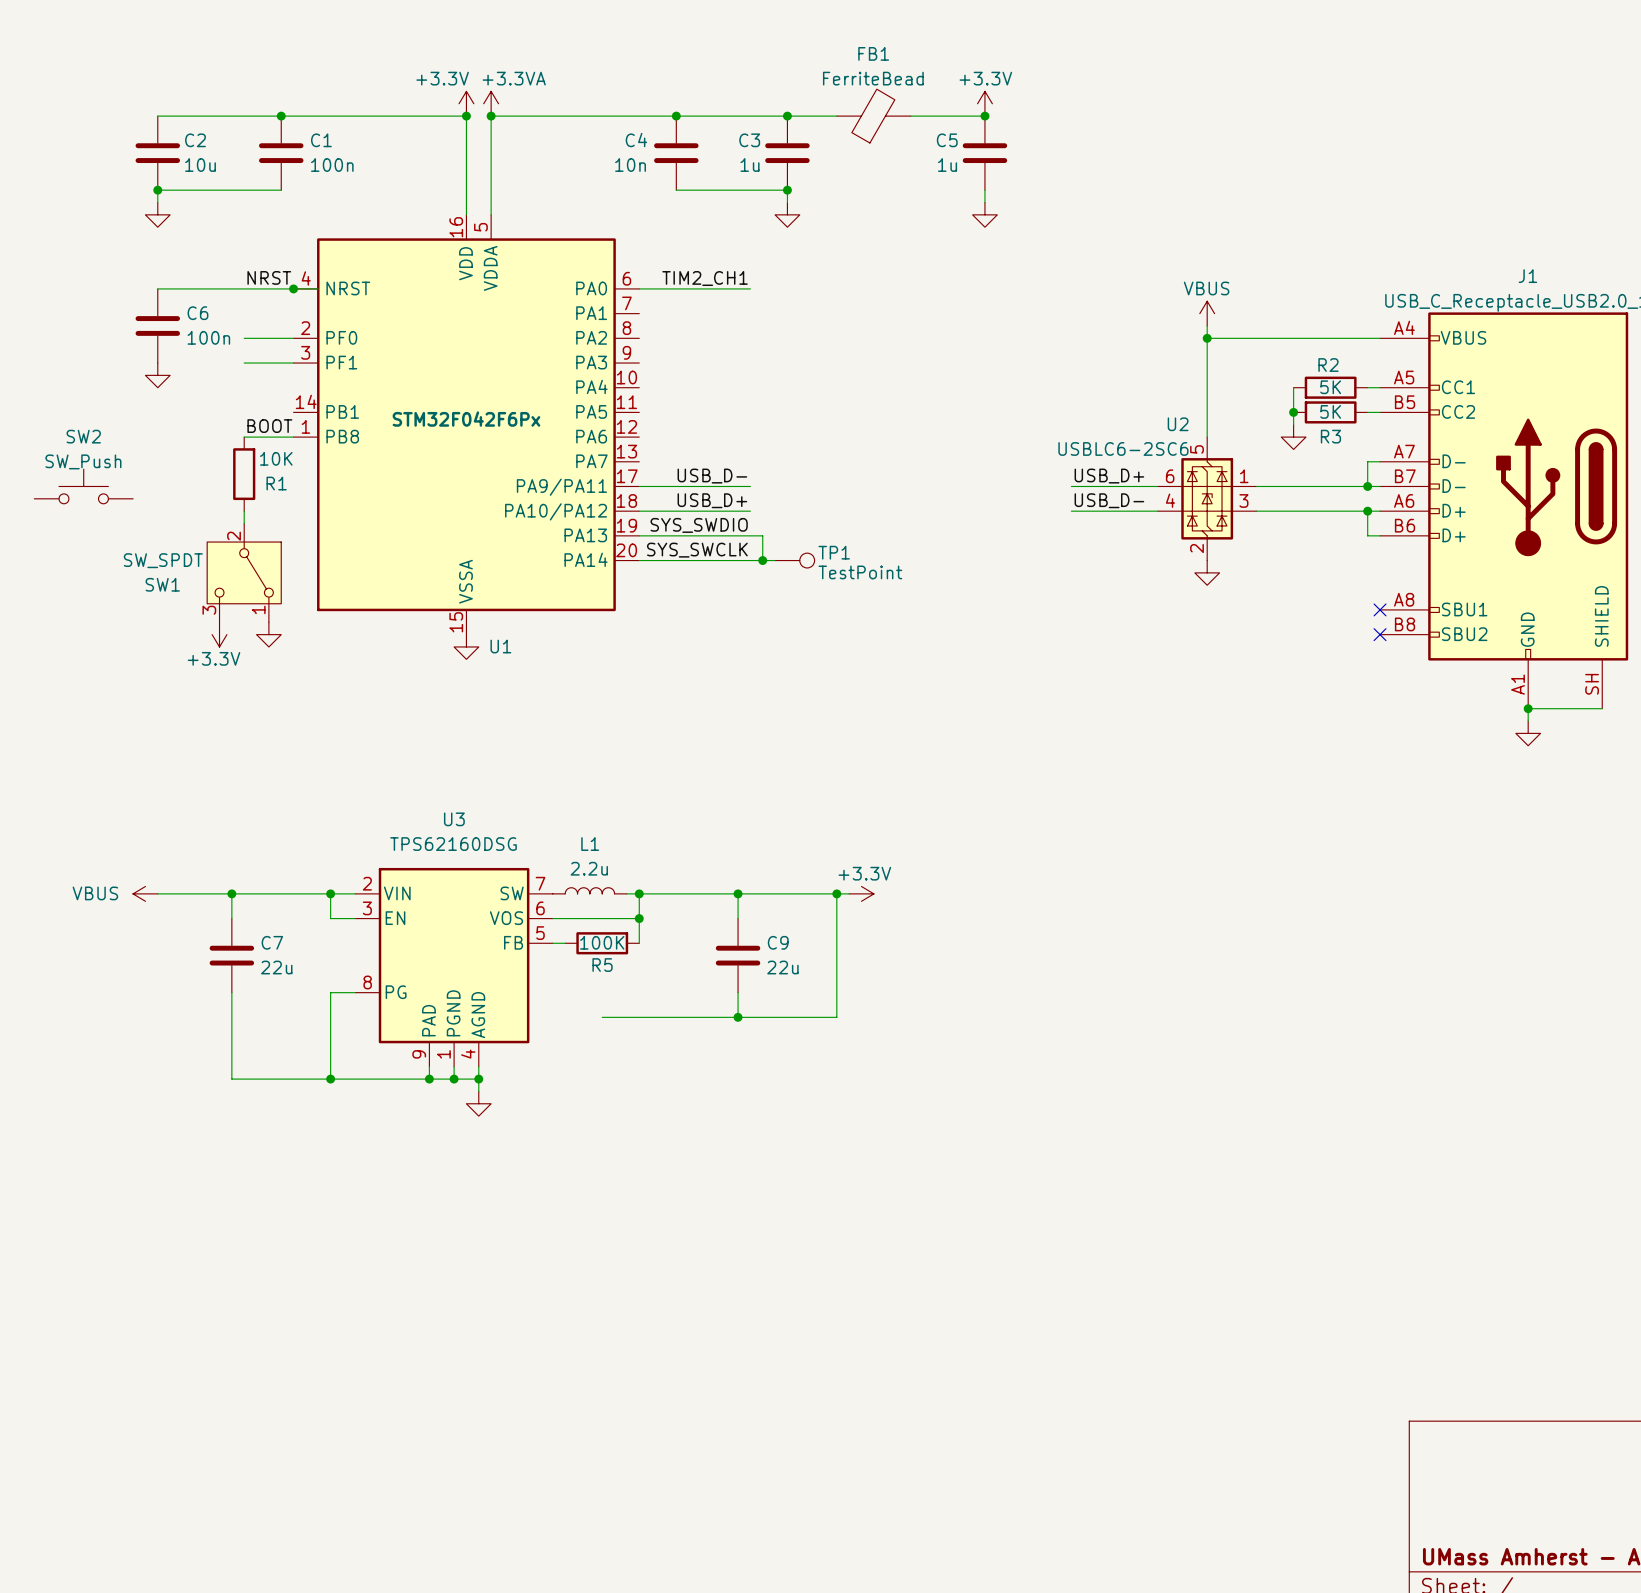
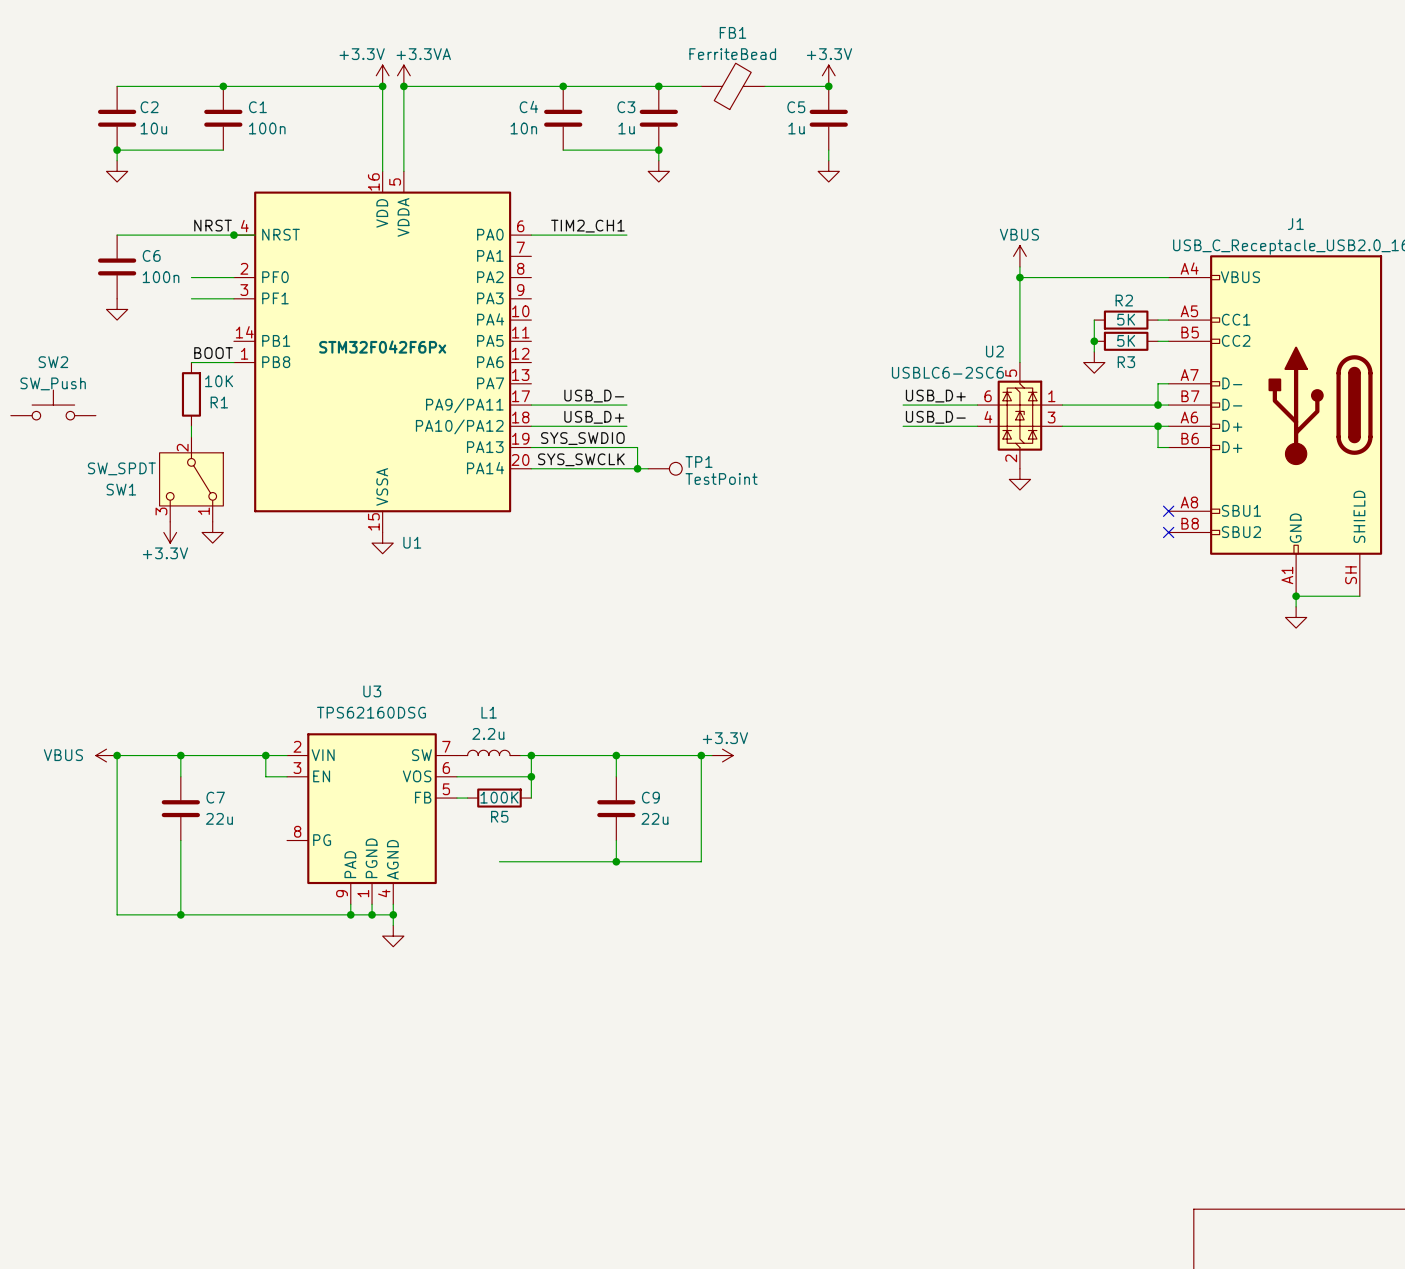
wire: none -> (117, 755) (117, 914) (180, 914)
junction: none -> (117, 755)
wire: (355, 992) (330, 992) (330, 1079) -> none
junction: none -> (180, 914)
junction: (330, 1079) -> none

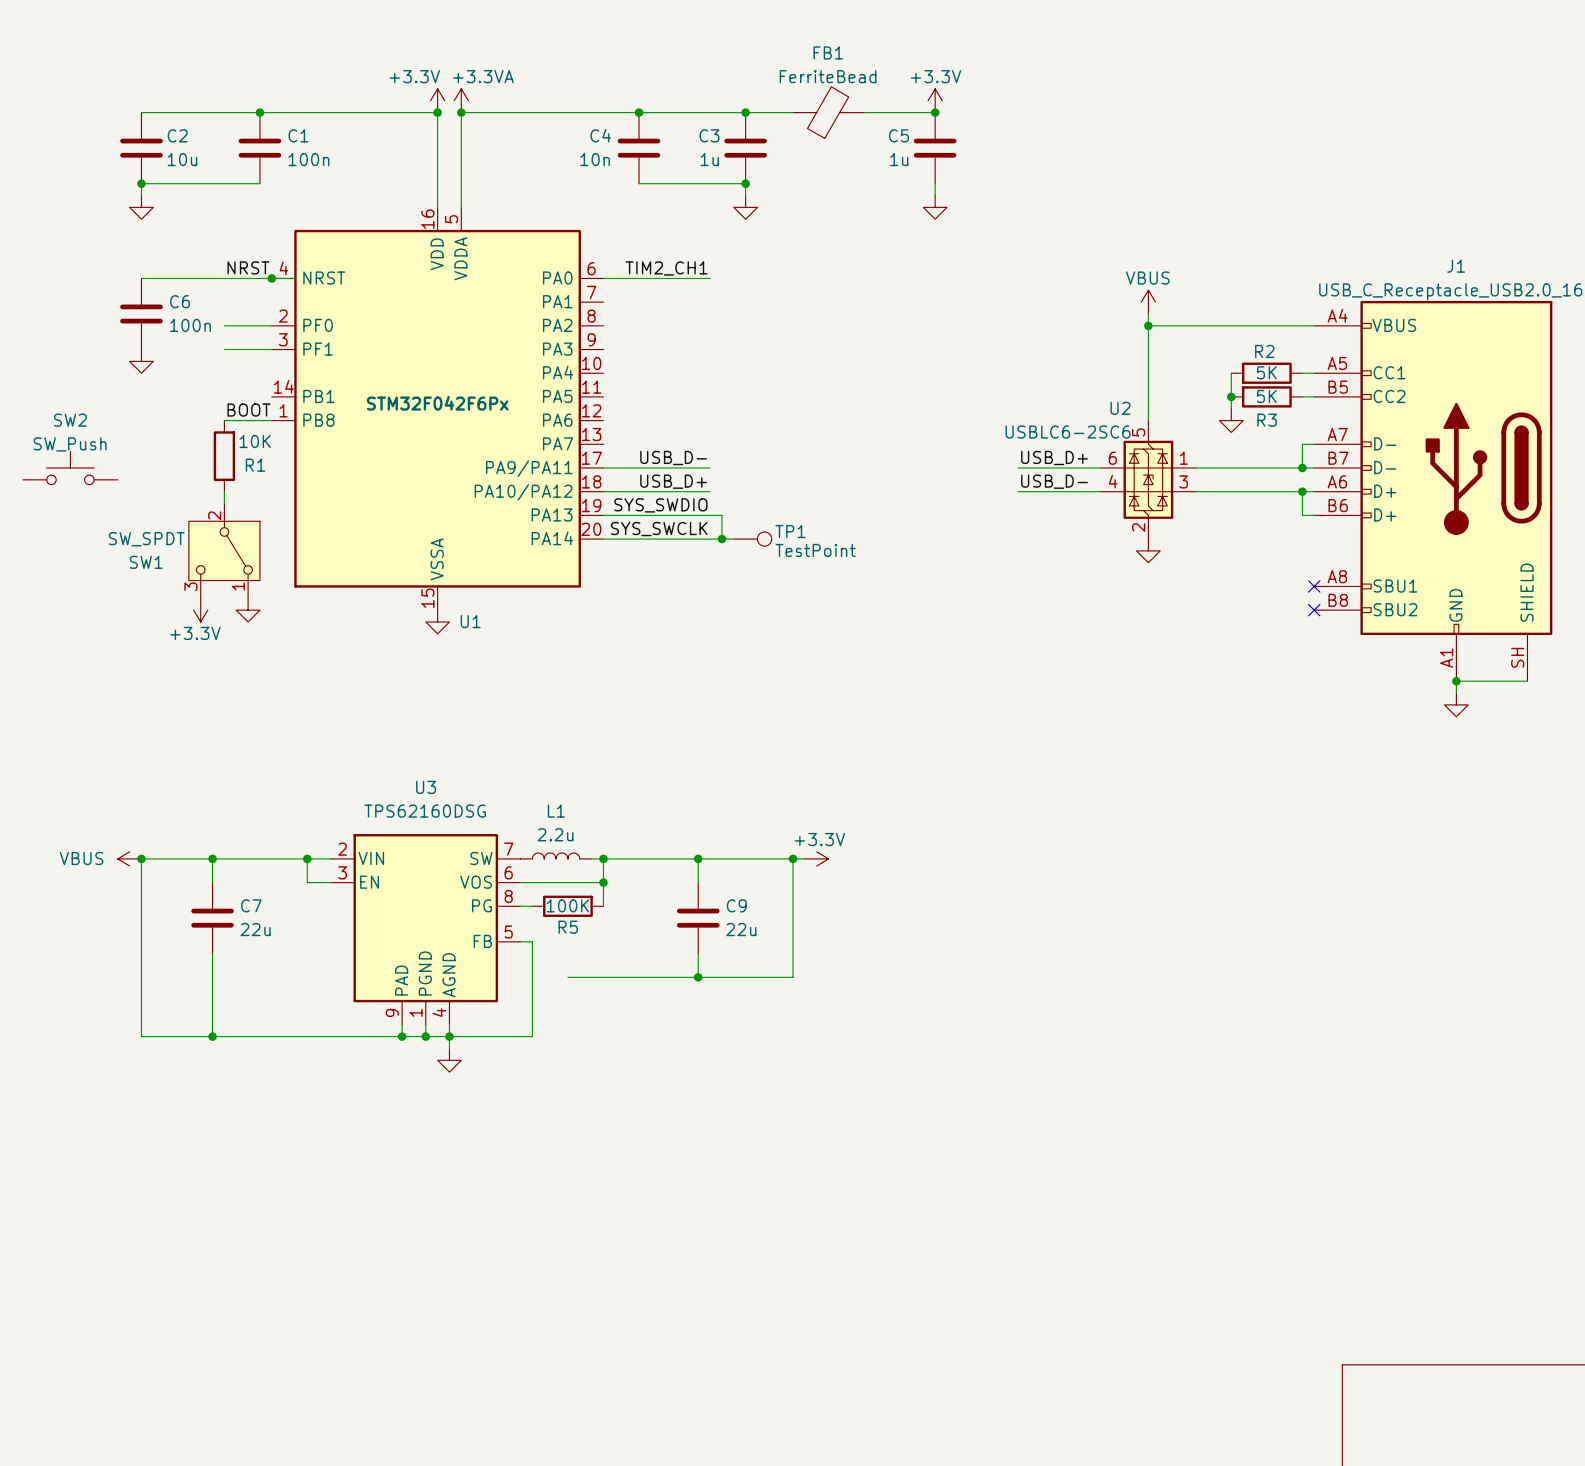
U3 symbol: [287, 733, 458, 905] -> [331, 834, 521, 1025]
wire: none -> (520, 941) (532, 941) (532, 1036) (449, 1036)

